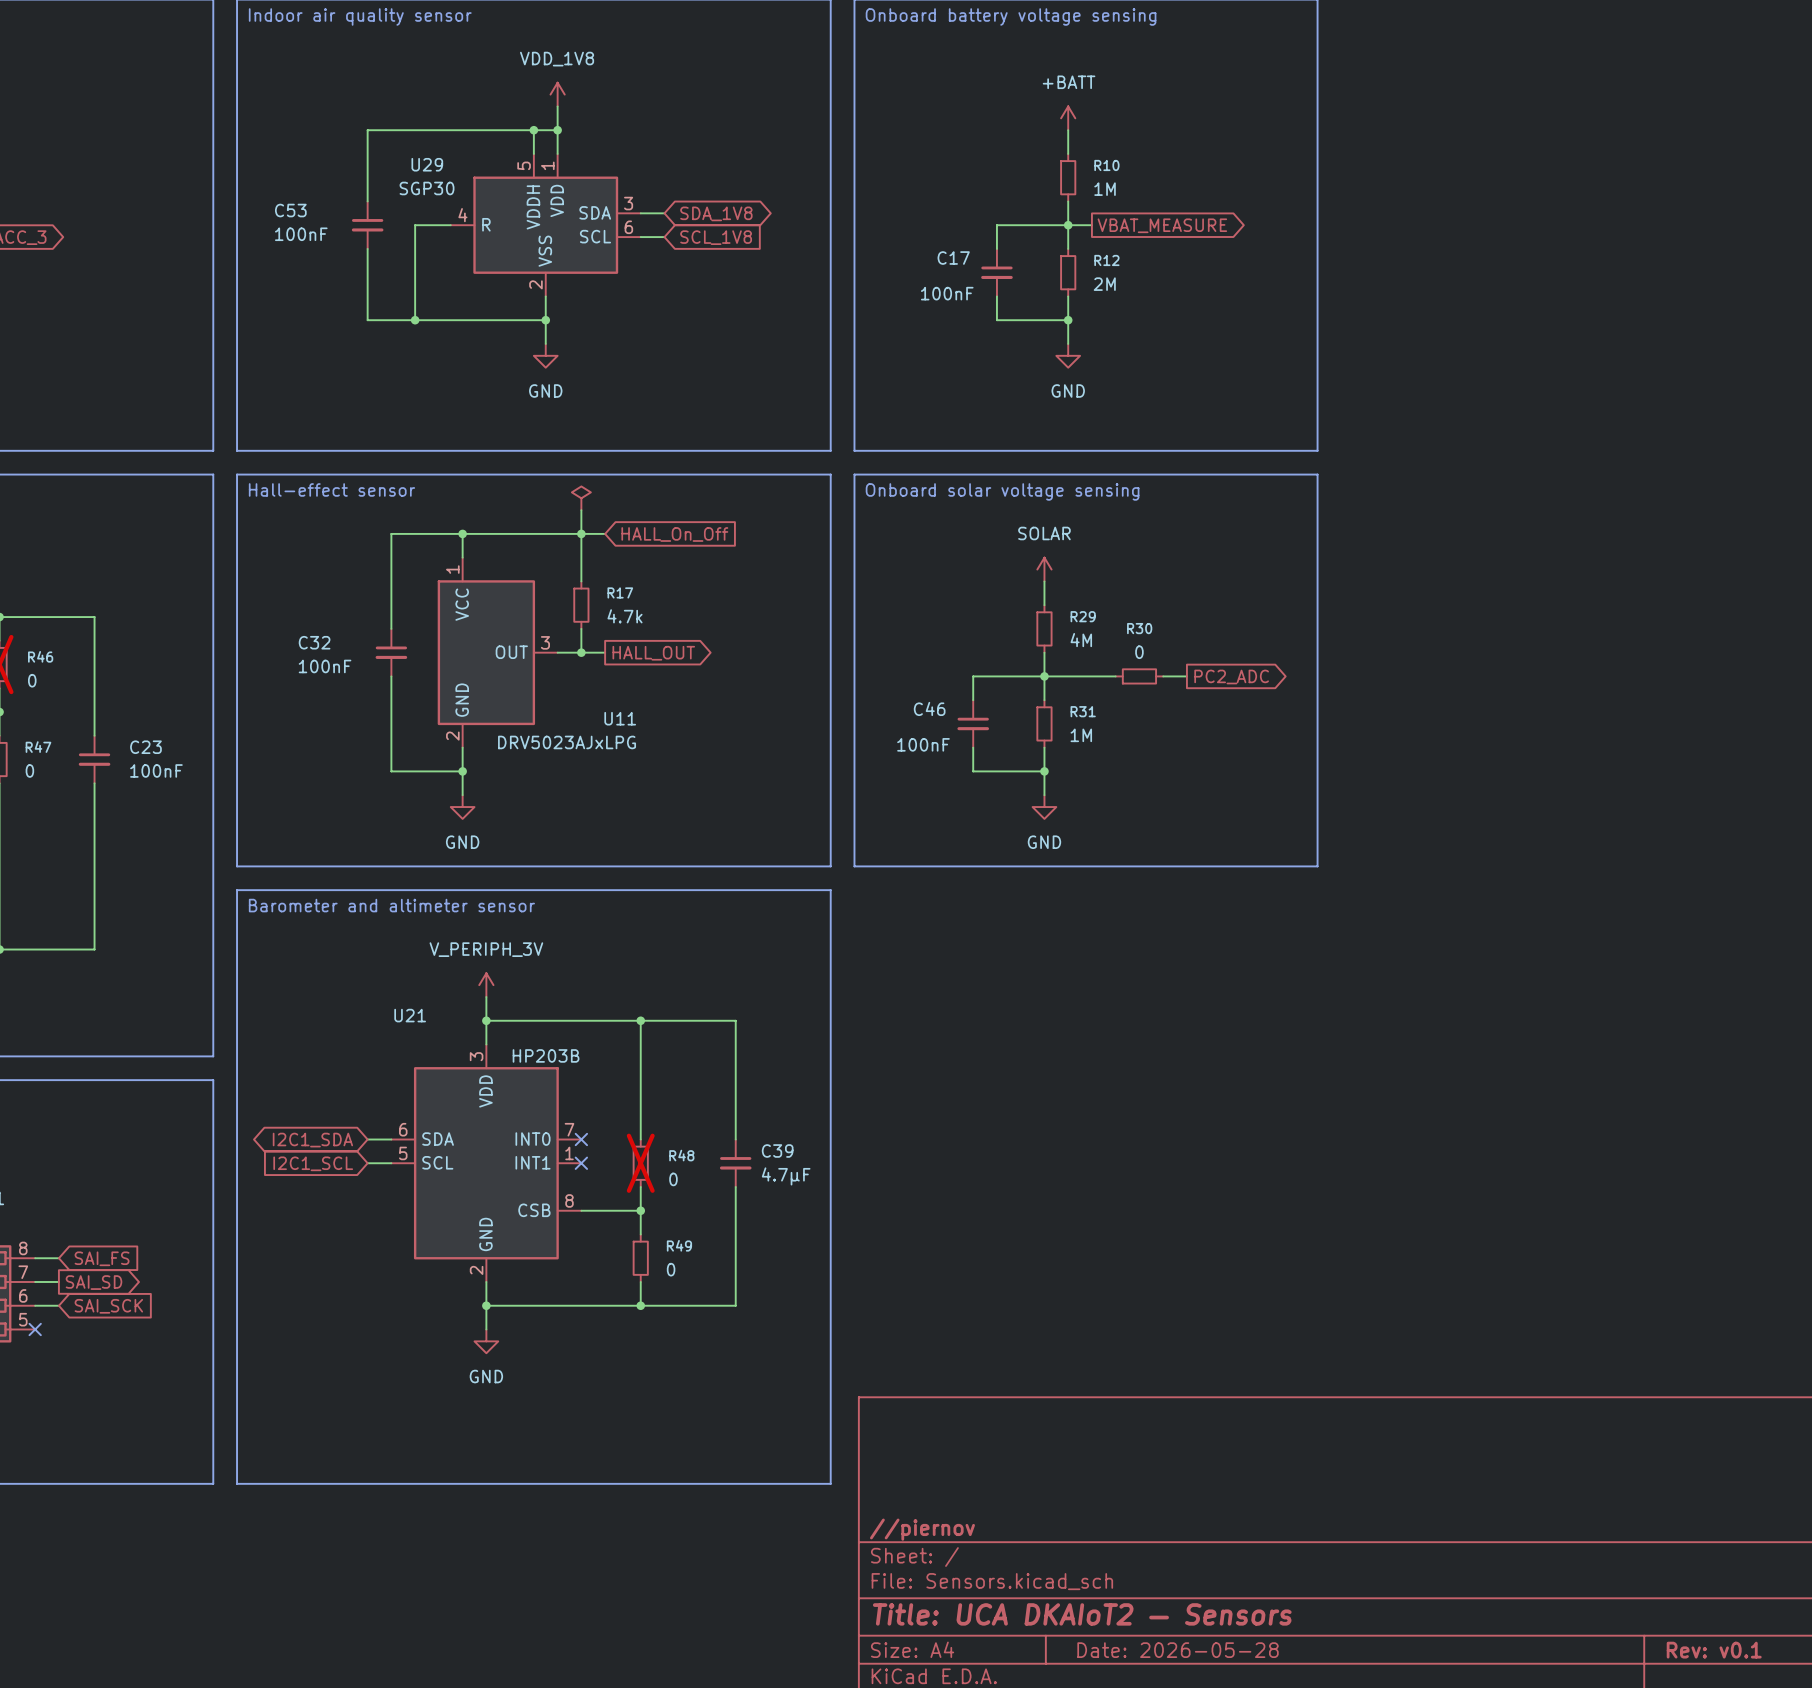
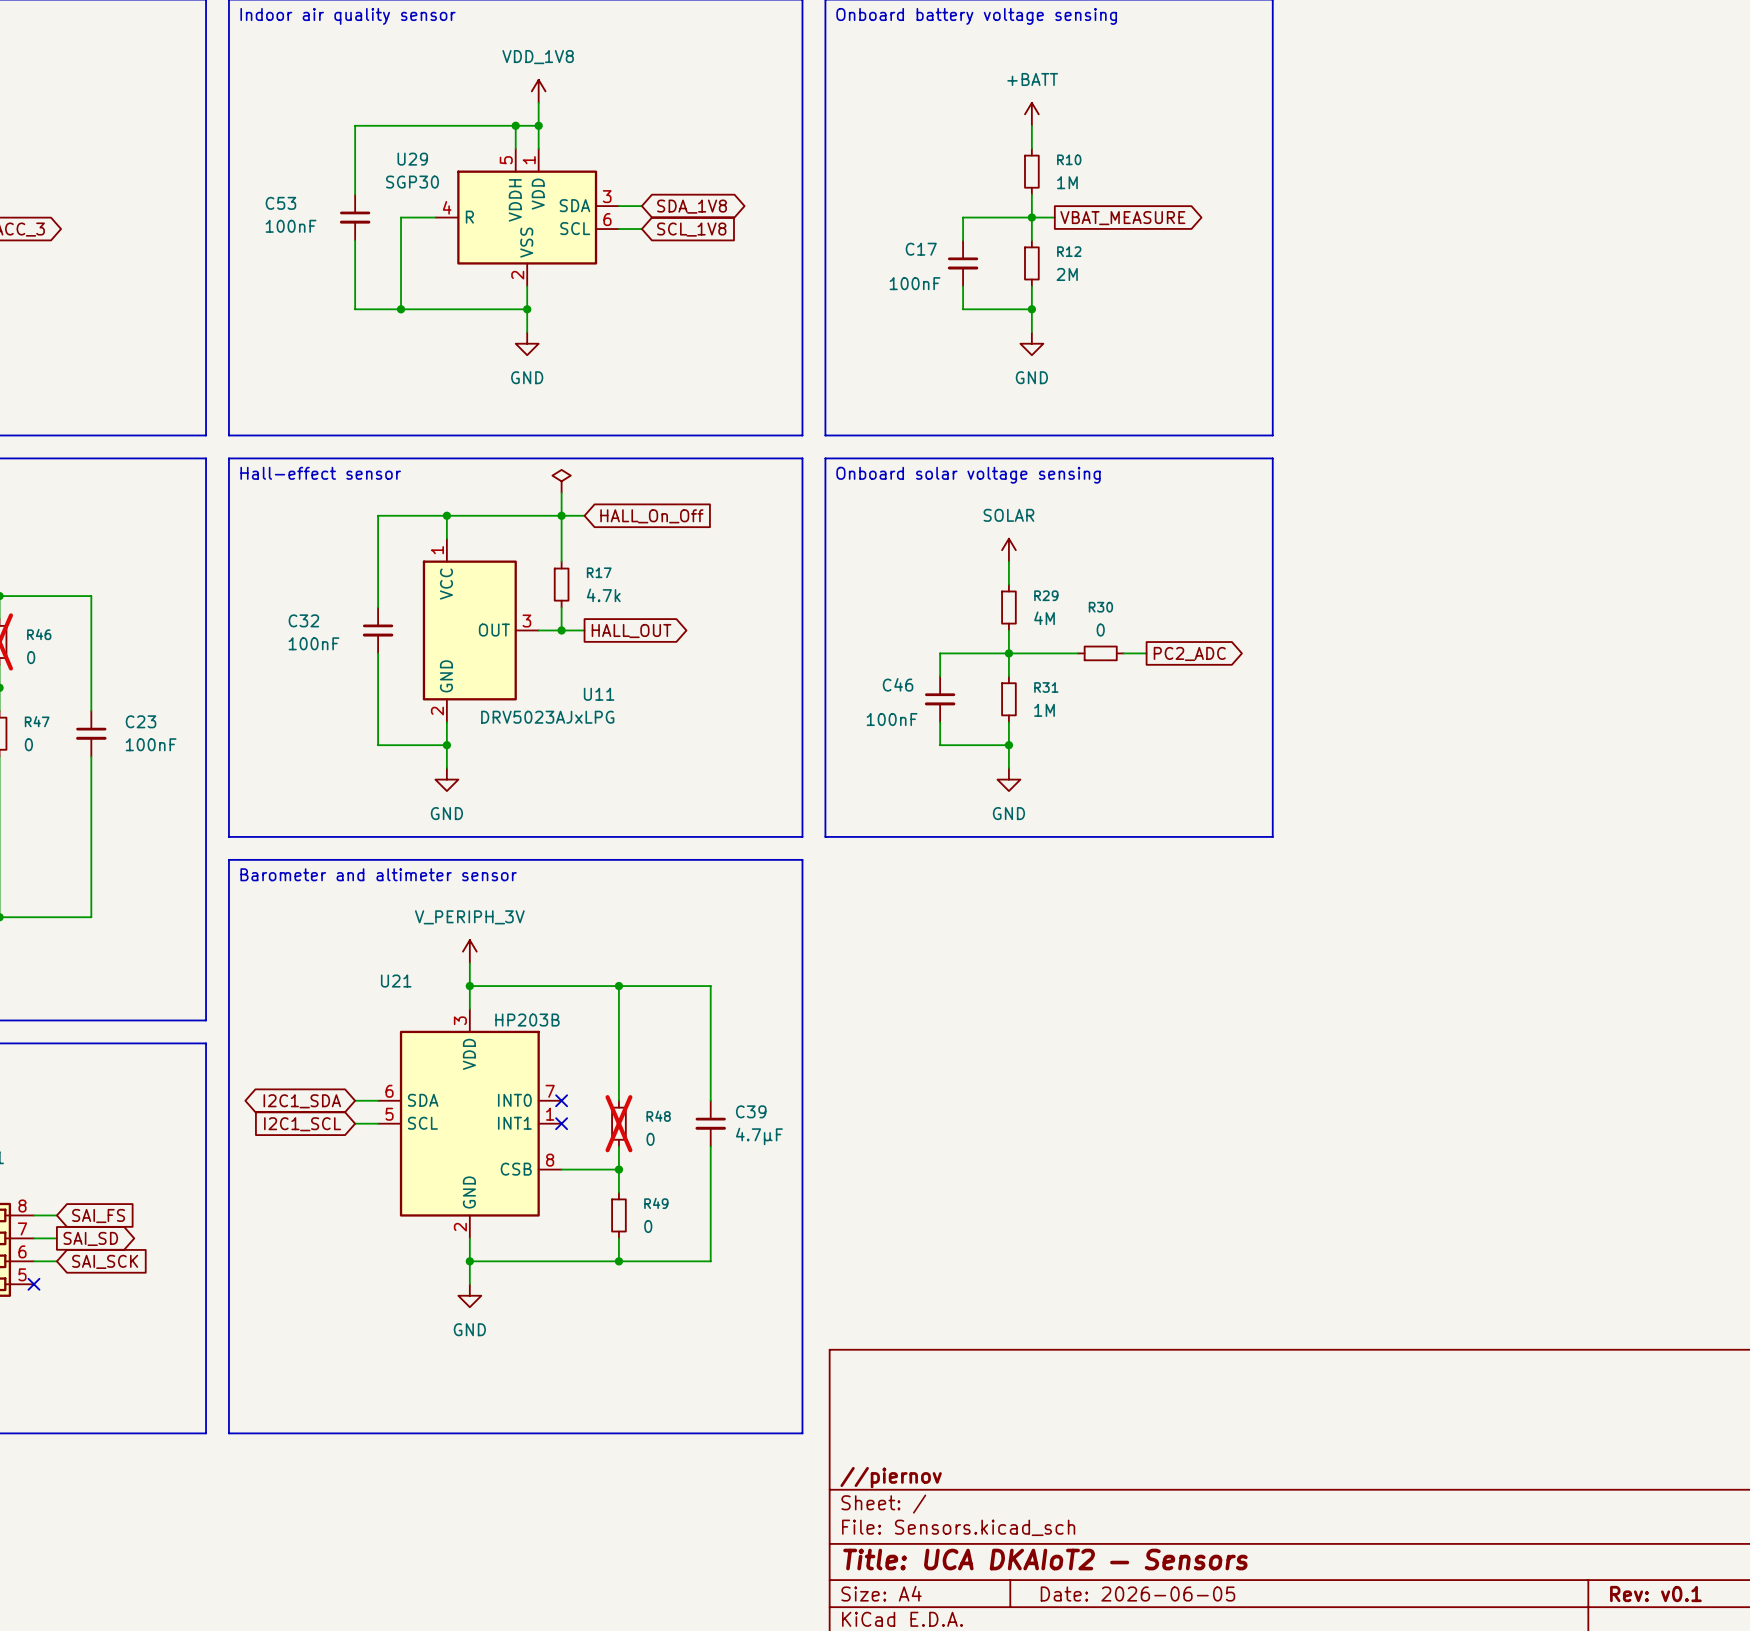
title block: Date: 2026-05-28 (1178, 1650) -> Date: 2026-06-05 (1137, 1594)

